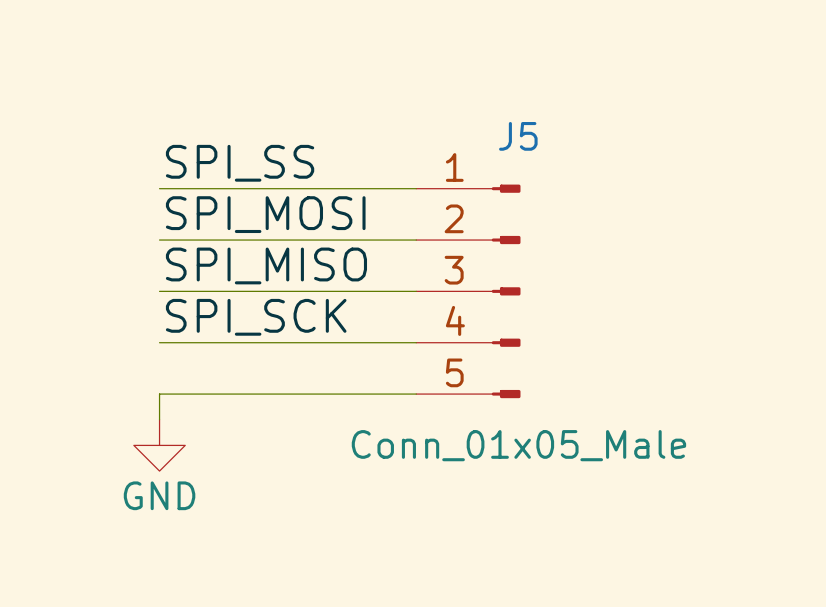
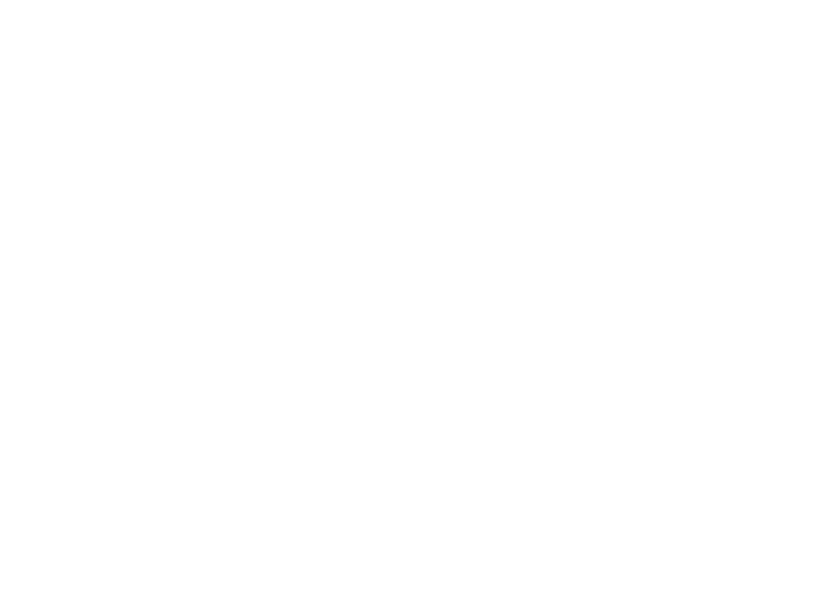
label: SPI_SS (240, 163) -> none
wire: (159, 188) (416, 188) -> none
label: SPI_MOSI (265, 214) -> none
wire: (159, 240) (416, 240) -> none
label: SPI_MISO (266, 265) -> none
wire: (159, 291) (416, 291) -> none
J5: Conn_01x05_Male (468, 291) -> none
label: SPI_SCK (256, 317) -> none
wire: (159, 342) (416, 342) -> none
wire: (416, 394) (159, 394) (159, 419) -> none
power symbol: GND (159, 445) -> none

